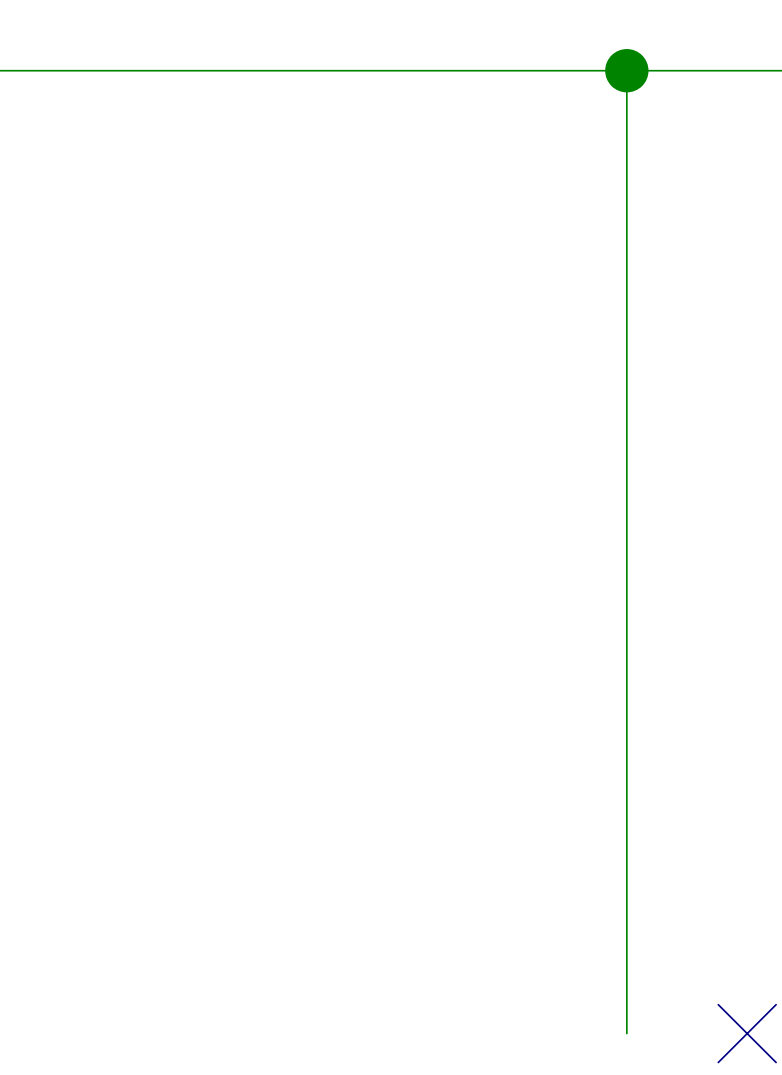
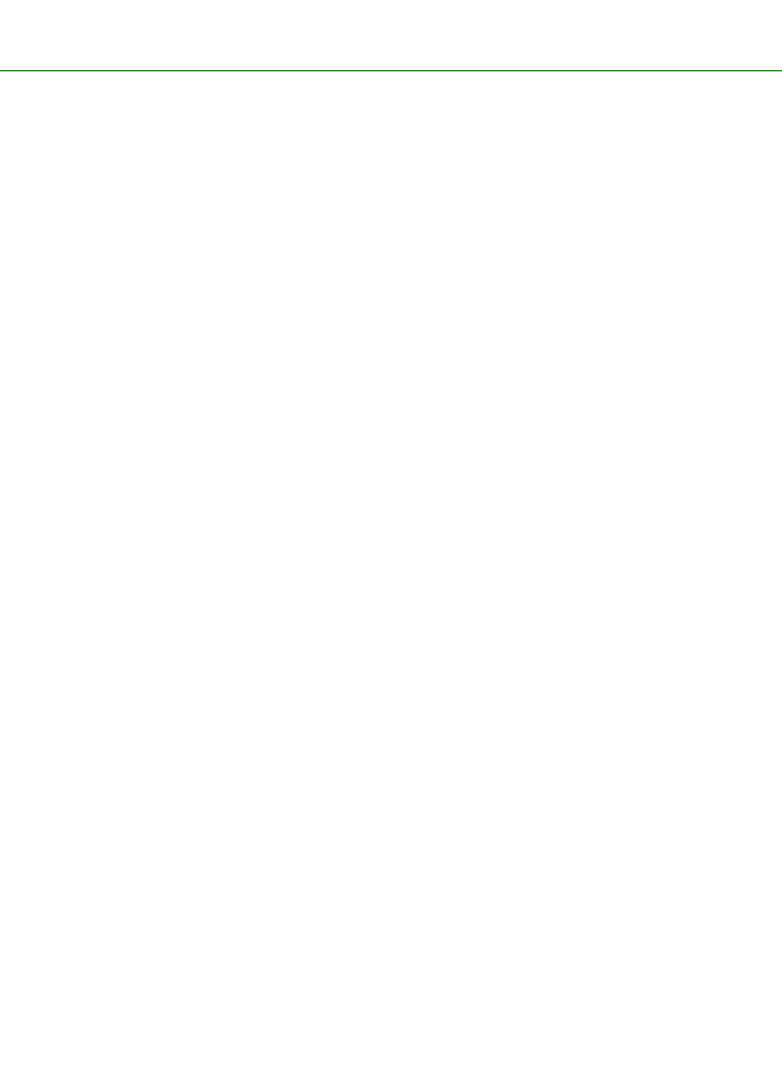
wire: (626, 70) (626, 1033) -> none
junction: (626, 70) -> none
no-connect mark: (747, 1033) -> none

